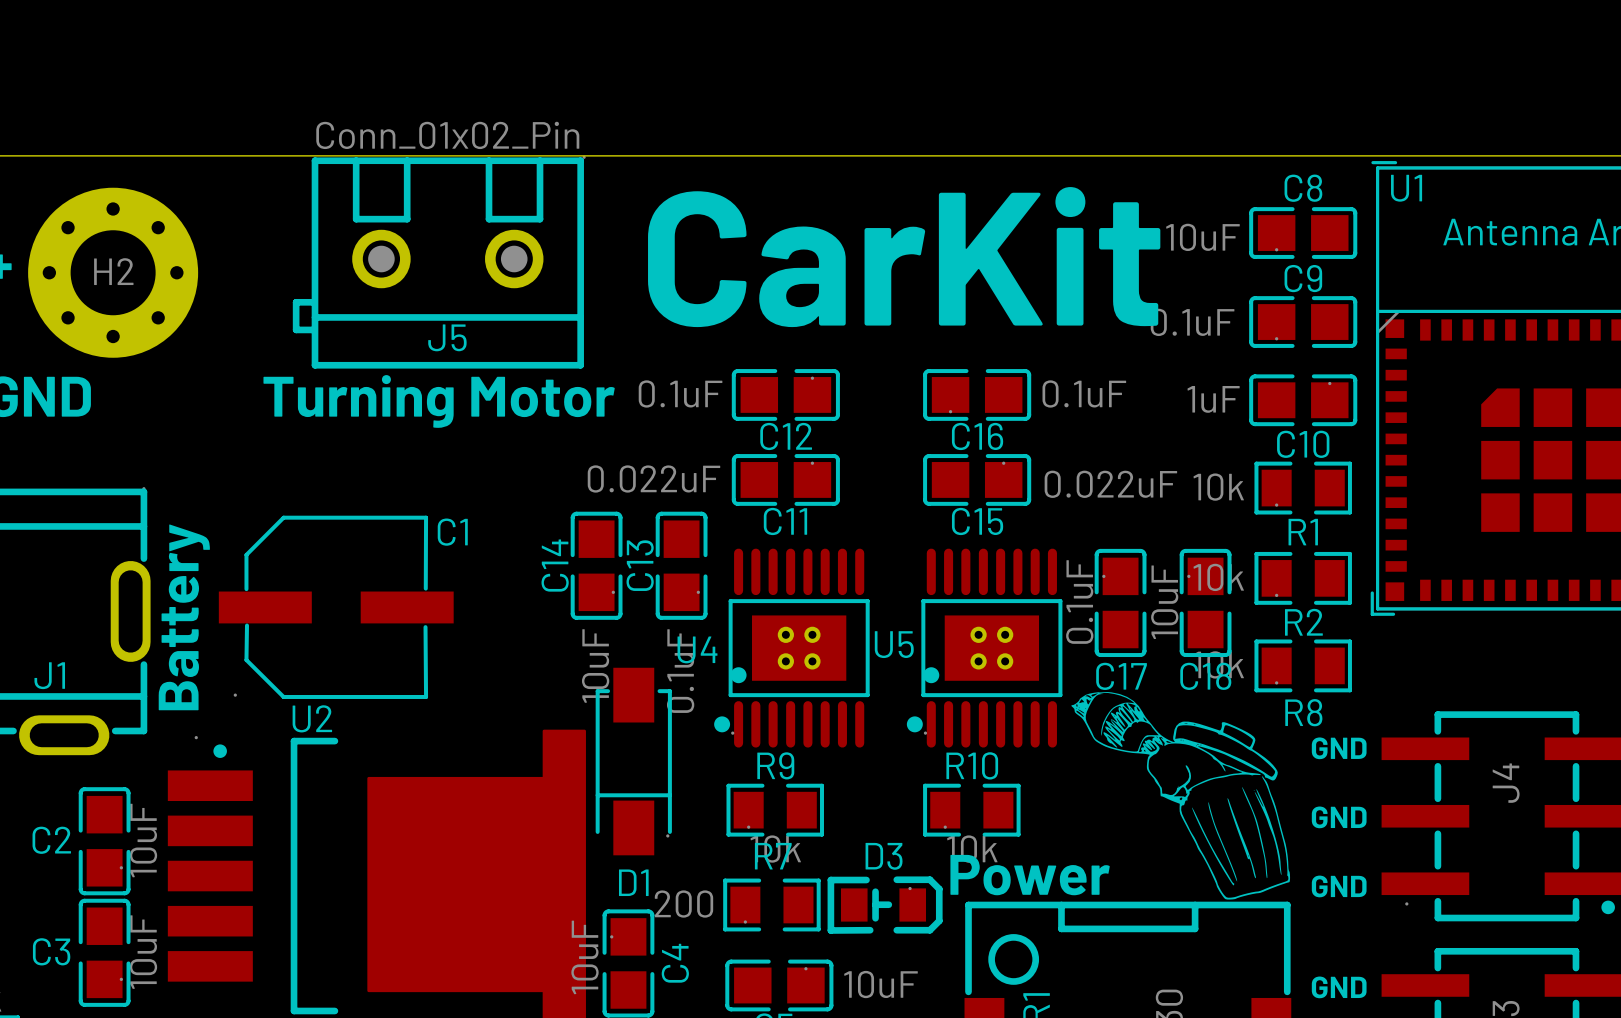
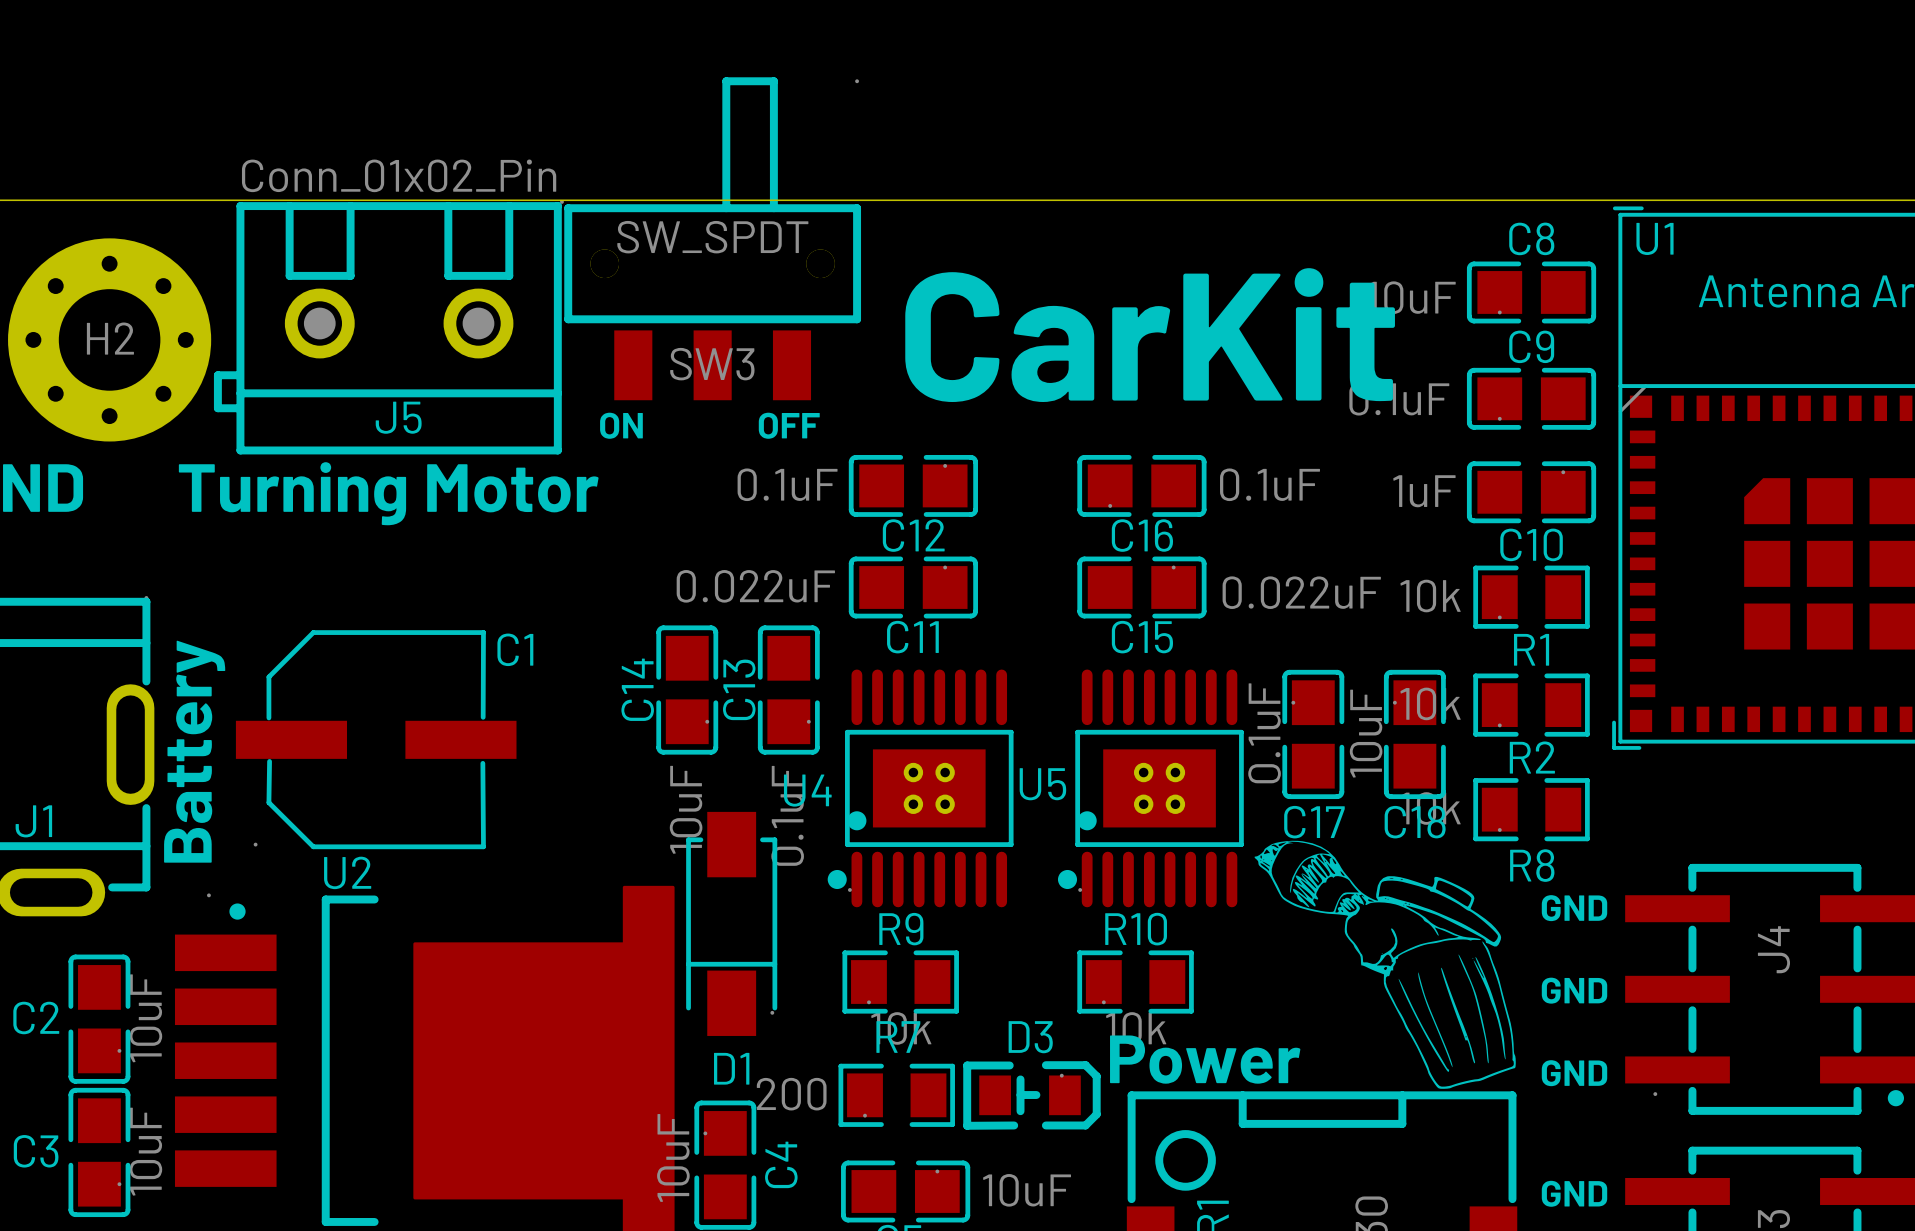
SW3: none -> SW_SPDT (712, 238)
text: CarKit (904, 257) -> OFF (789, 425)
J5 position: (439, 262) -> (388, 327)
text: none -> CarKit (1150, 335)
text: none -> ON (621, 425)
text position: Turning Motor (439, 401) -> Turning Motor (388, 493)

